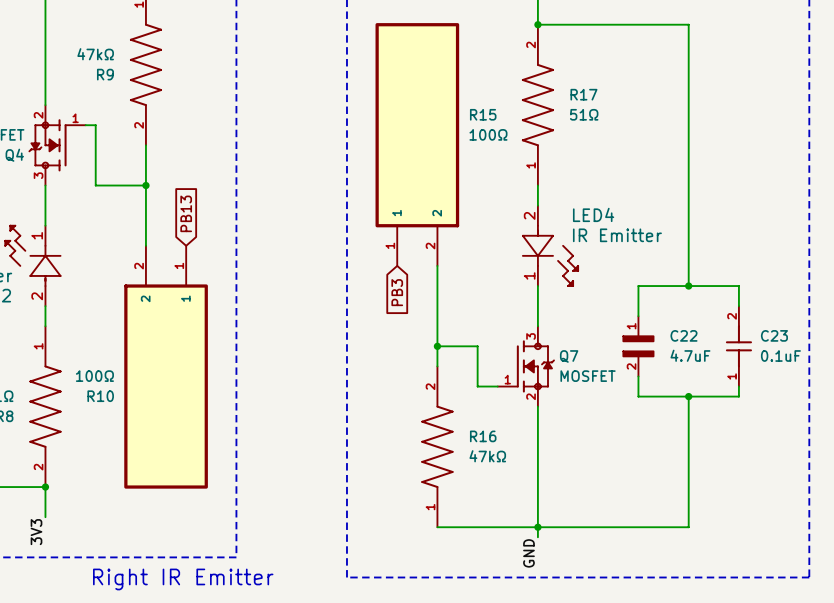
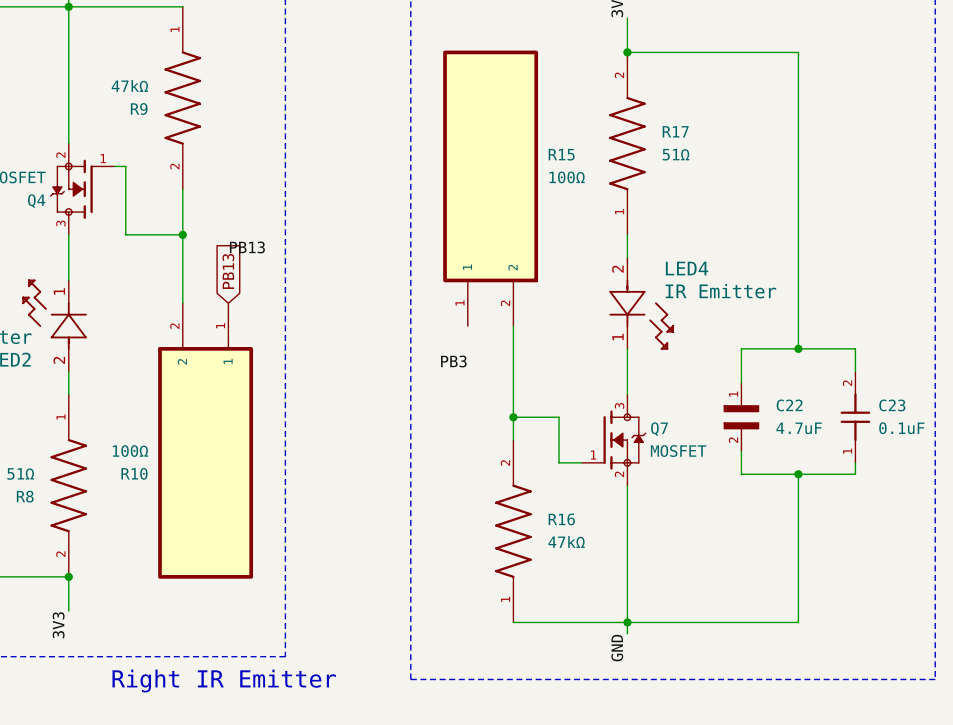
label: none -> PB13 (247, 247)
global label: PB3 (397, 292) -> none
label: none -> PB3 (453, 361)

